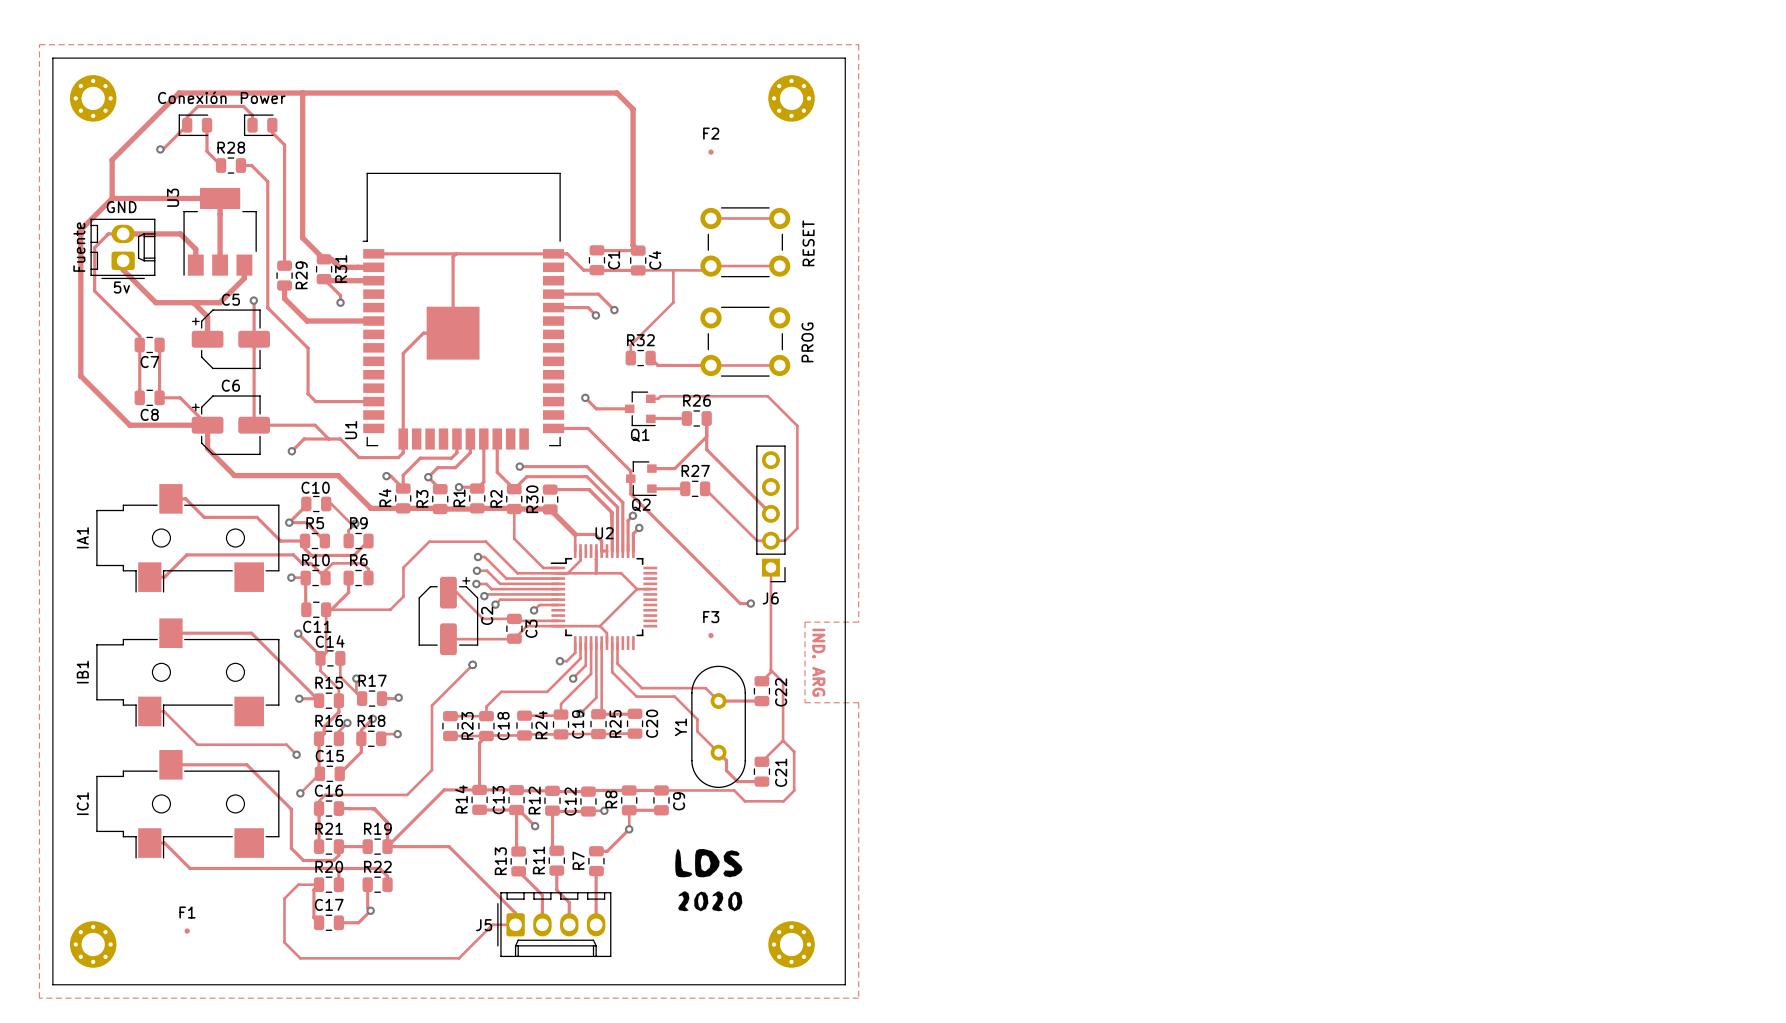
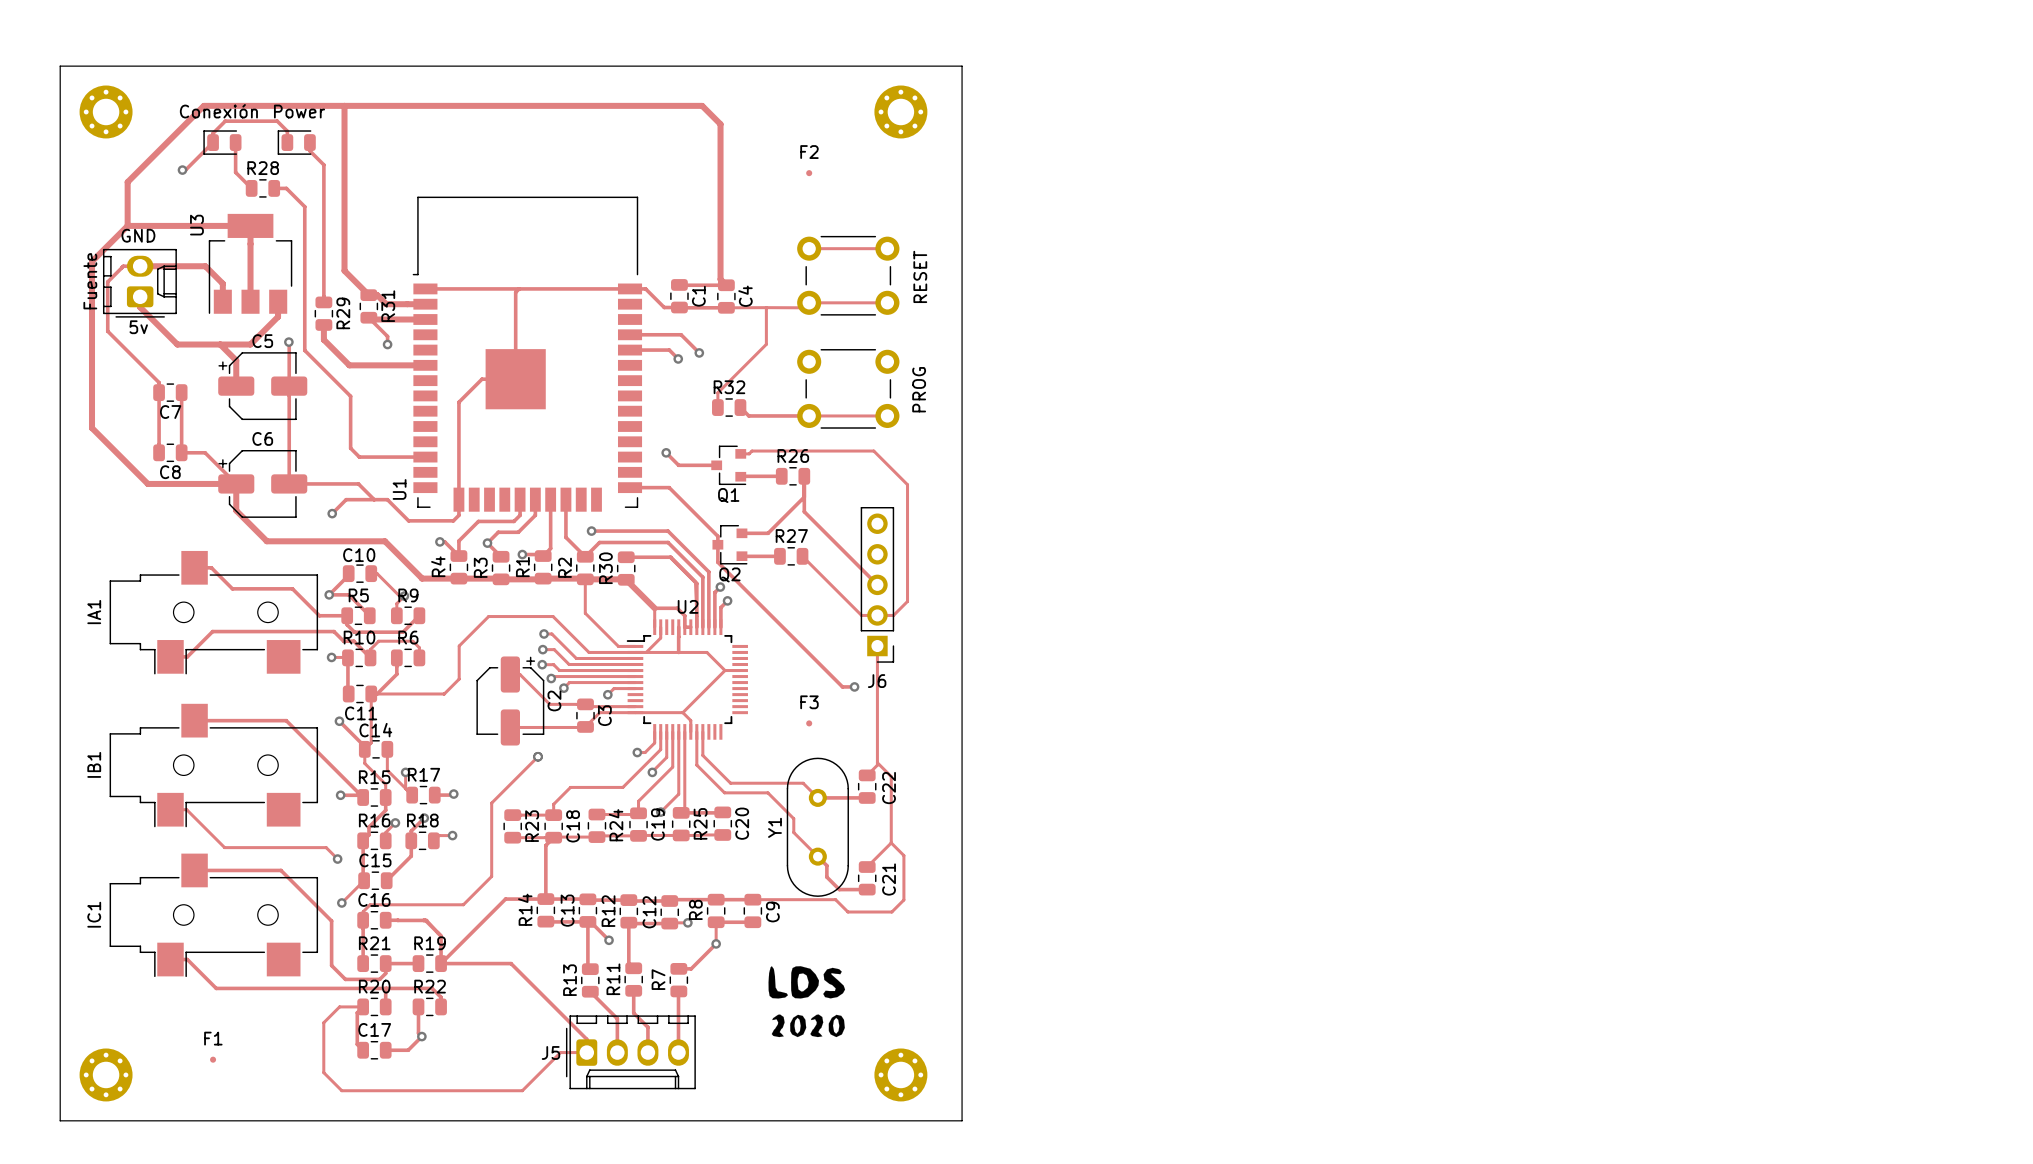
zone outline: (39, 44) (39, 998) (858, 998) (858, 702) (804, 702) (804, 622) (858, 622) (858, 44) (39, 44) -> none
text: IND. ARG (818, 662) -> none

